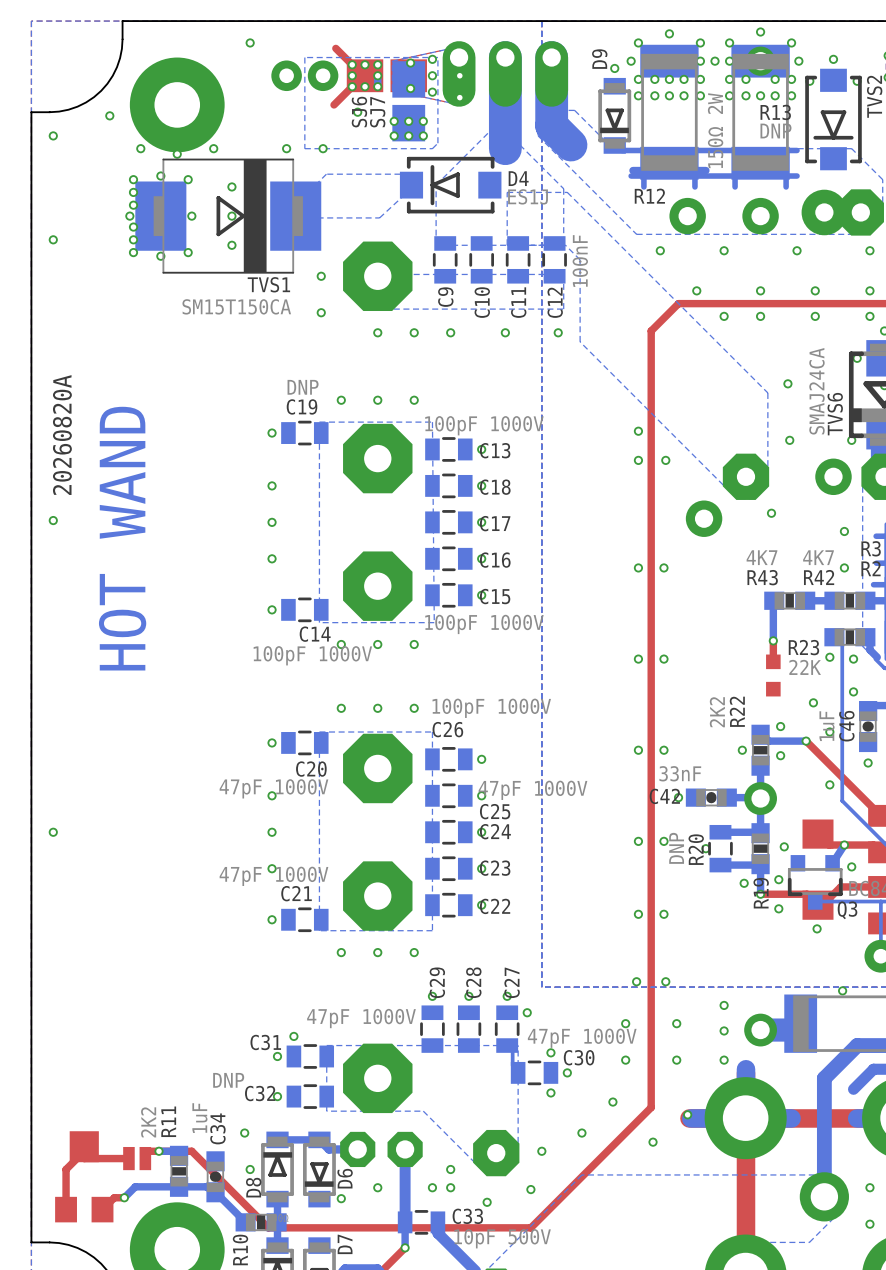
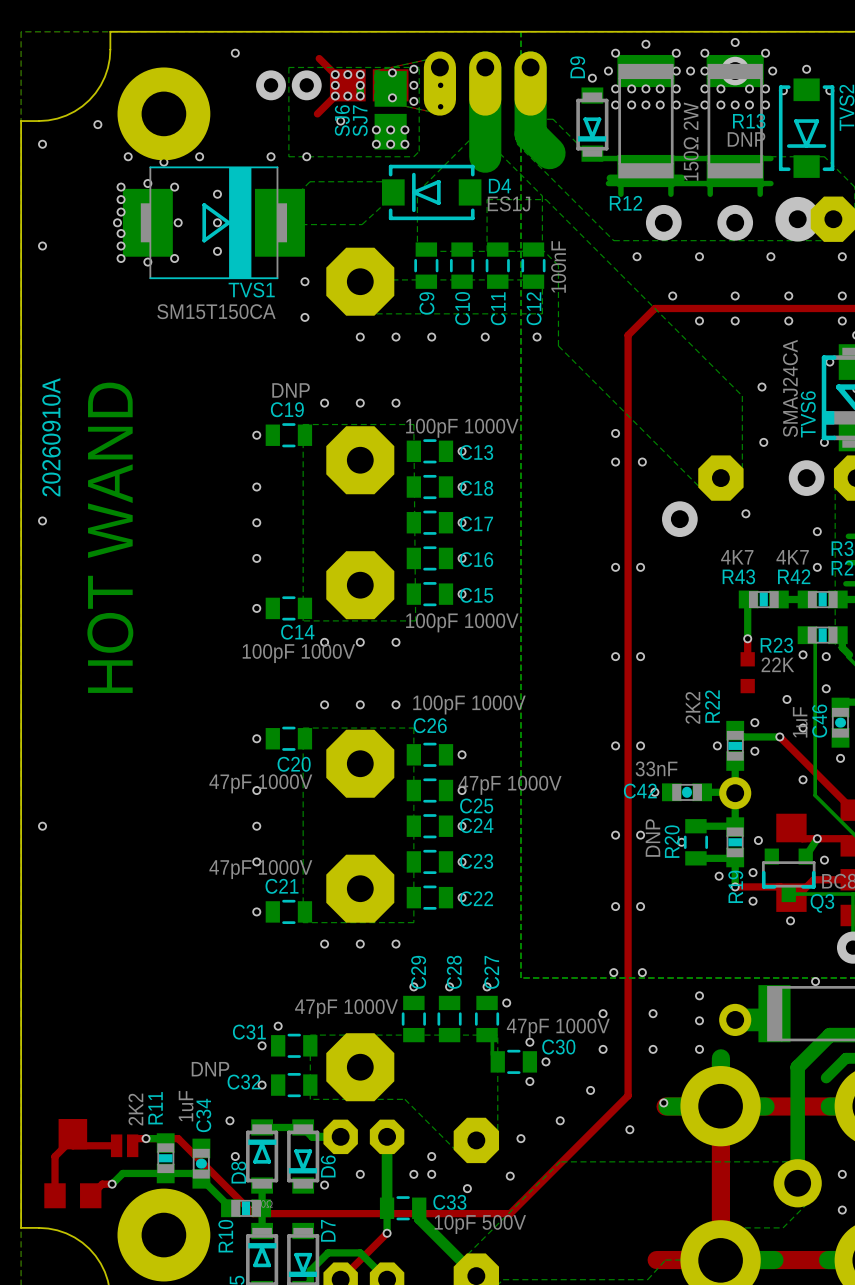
drawing shape: [52, 375, 147, 671] -> [42, 378, 134, 693]

